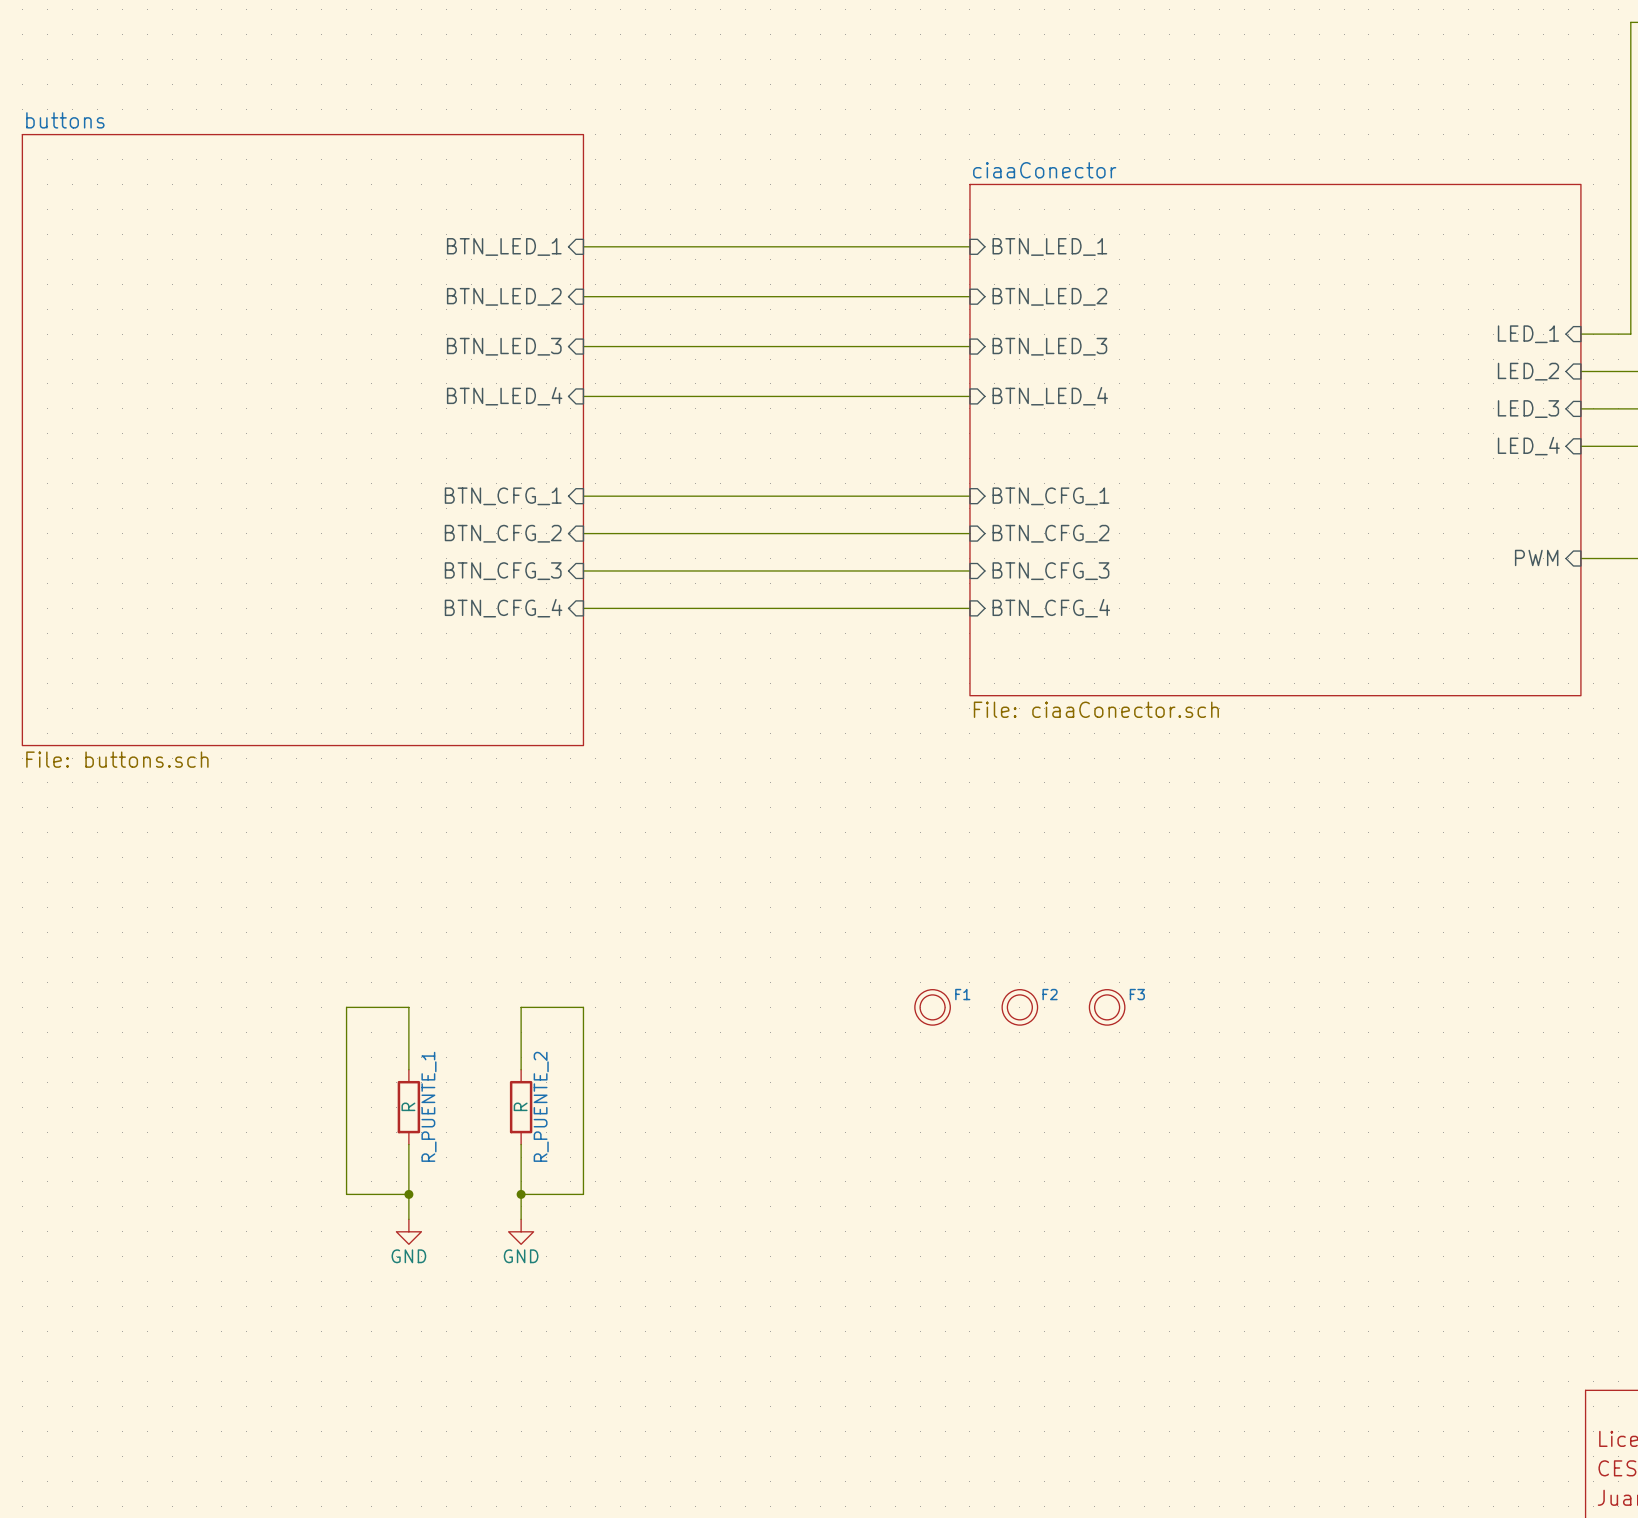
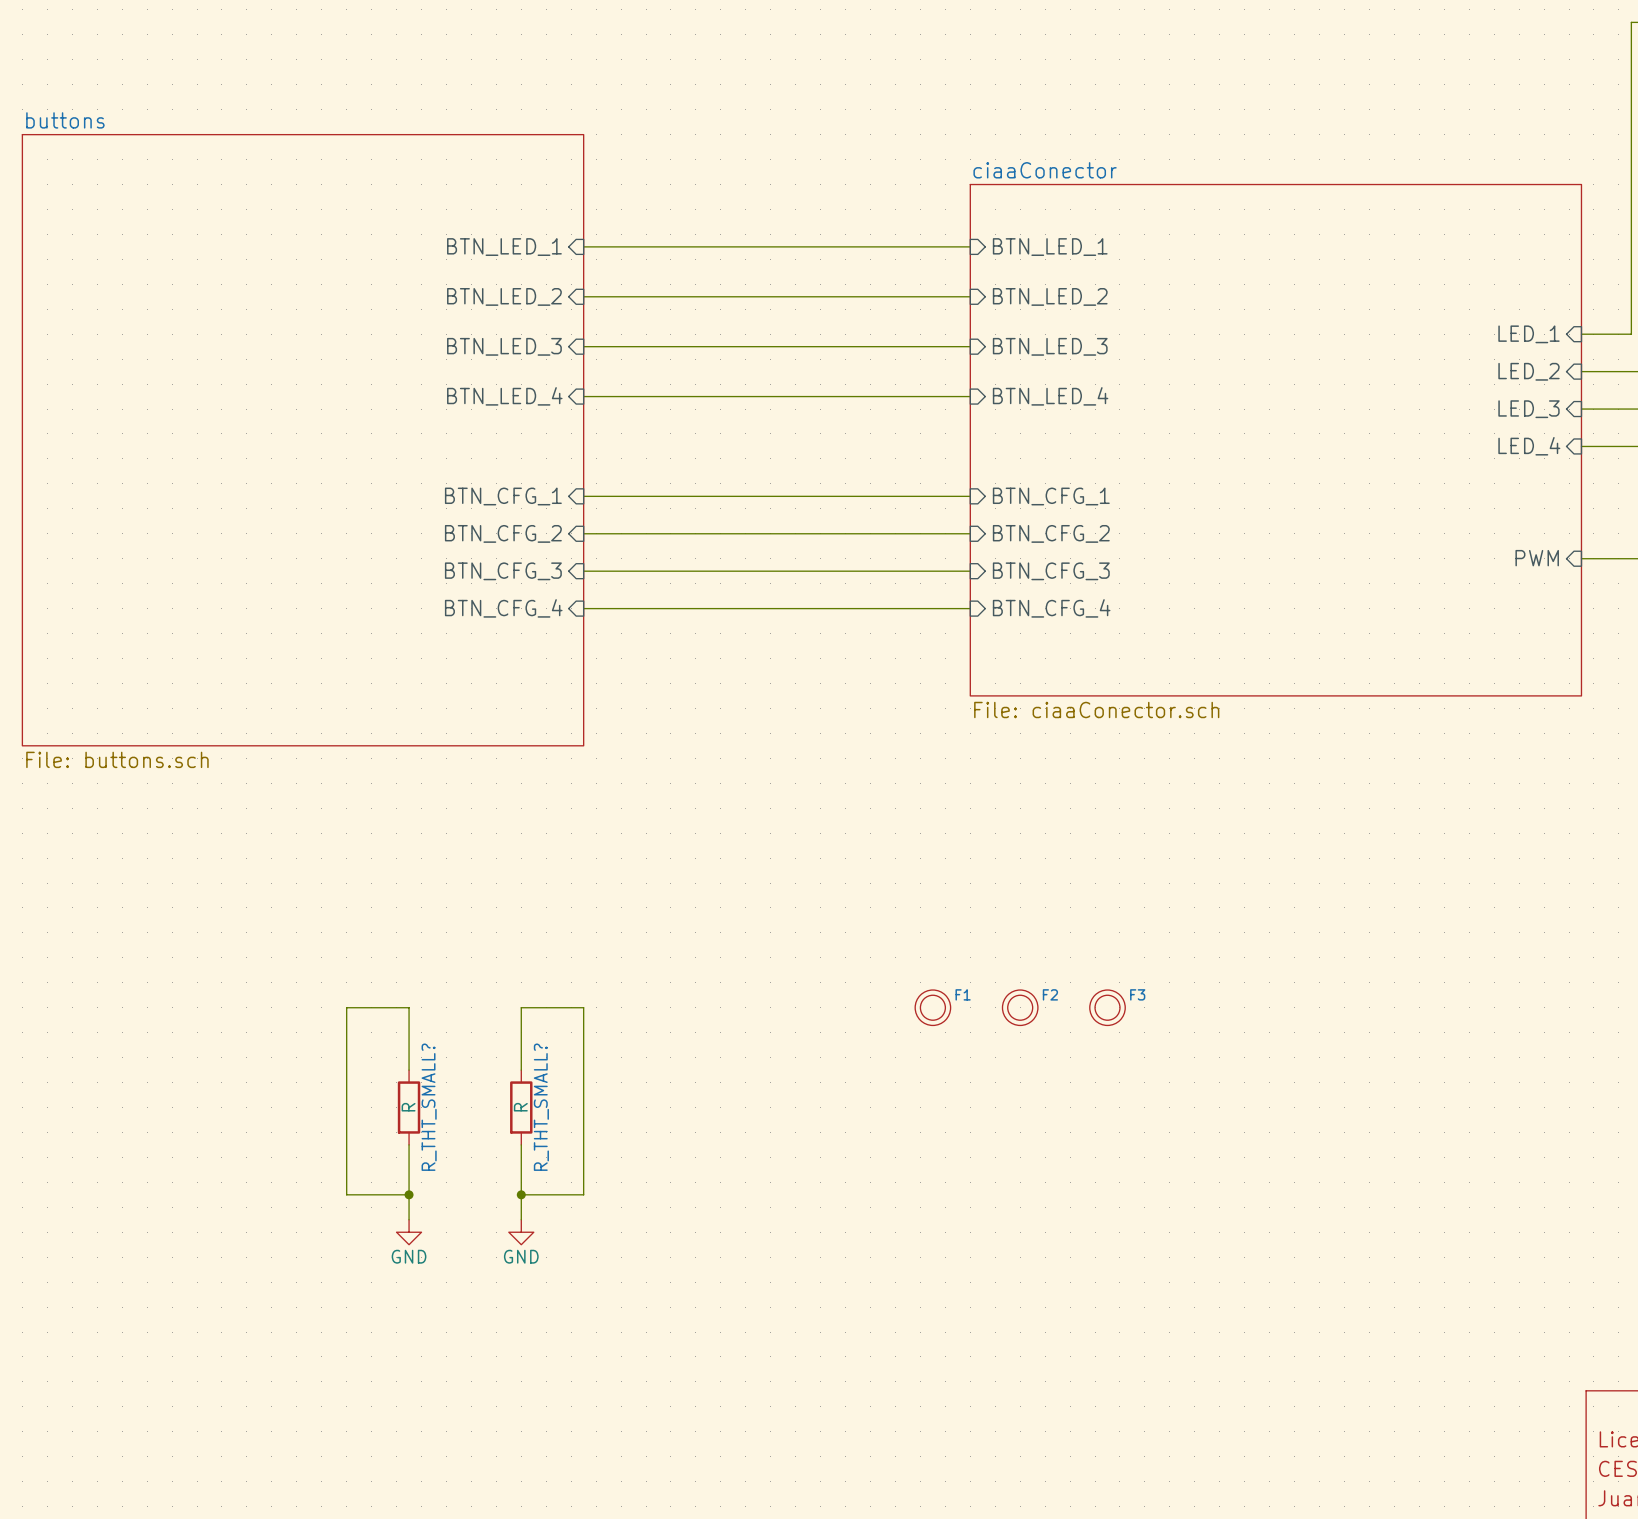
R_PUENTE_1 name: R_PUENTE_1 (428, 1106) -> R_THT_SMALL? (429, 1107)
R_PUENTE_2 name: R_PUENTE_2 (541, 1106) -> R_THT_SMALL? (541, 1107)

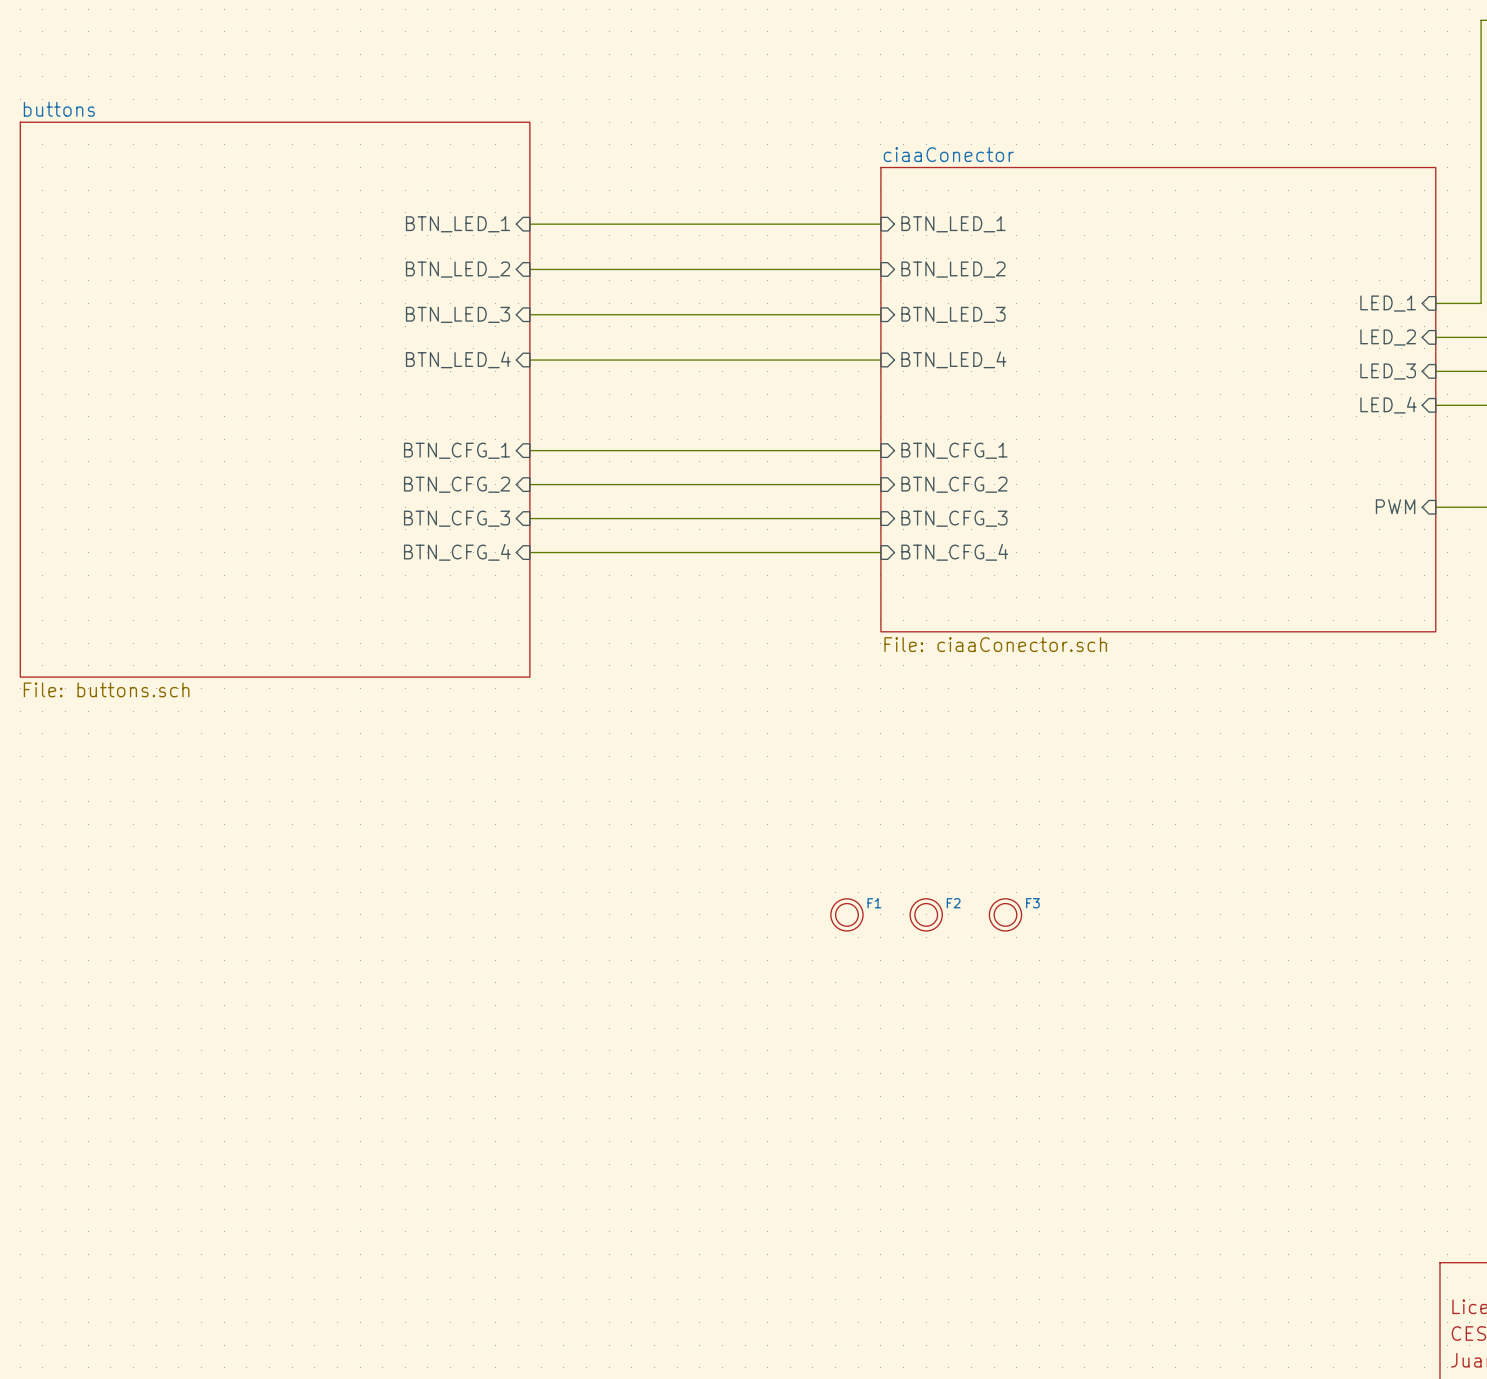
wire: (409, 1070) (409, 1007) (346, 1007) (346, 1194) (409, 1194) -> none
wire: (521, 1070) (521, 1007) (583, 1007) (583, 1194) (521, 1194) -> none
R_THT_SMALL?: R (409, 1107) -> none
R_THT_SMALL?: R (521, 1107) -> none
wire: (409, 1144) (409, 1219) -> none
wire: (521, 1144) (521, 1219) -> none
junction: (409, 1194) -> none
junction: (521, 1194) -> none
power symbol: GND (409, 1232) -> none
power symbol: GND (521, 1232) -> none

